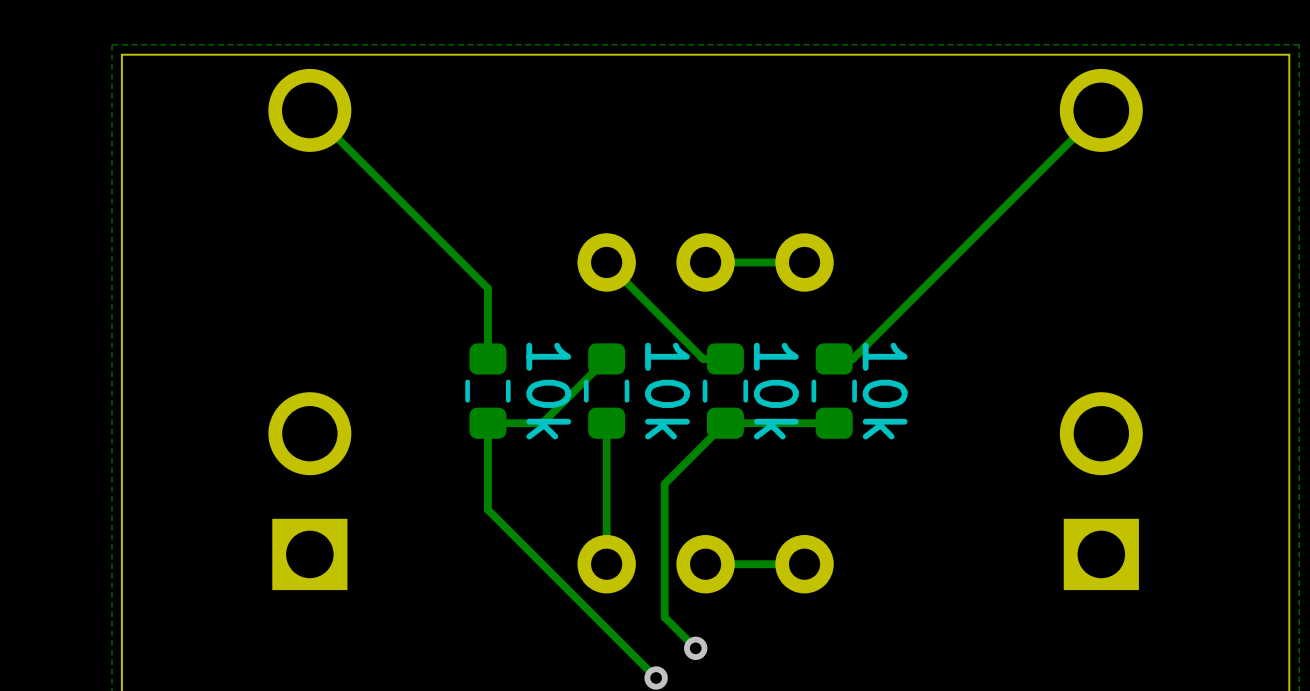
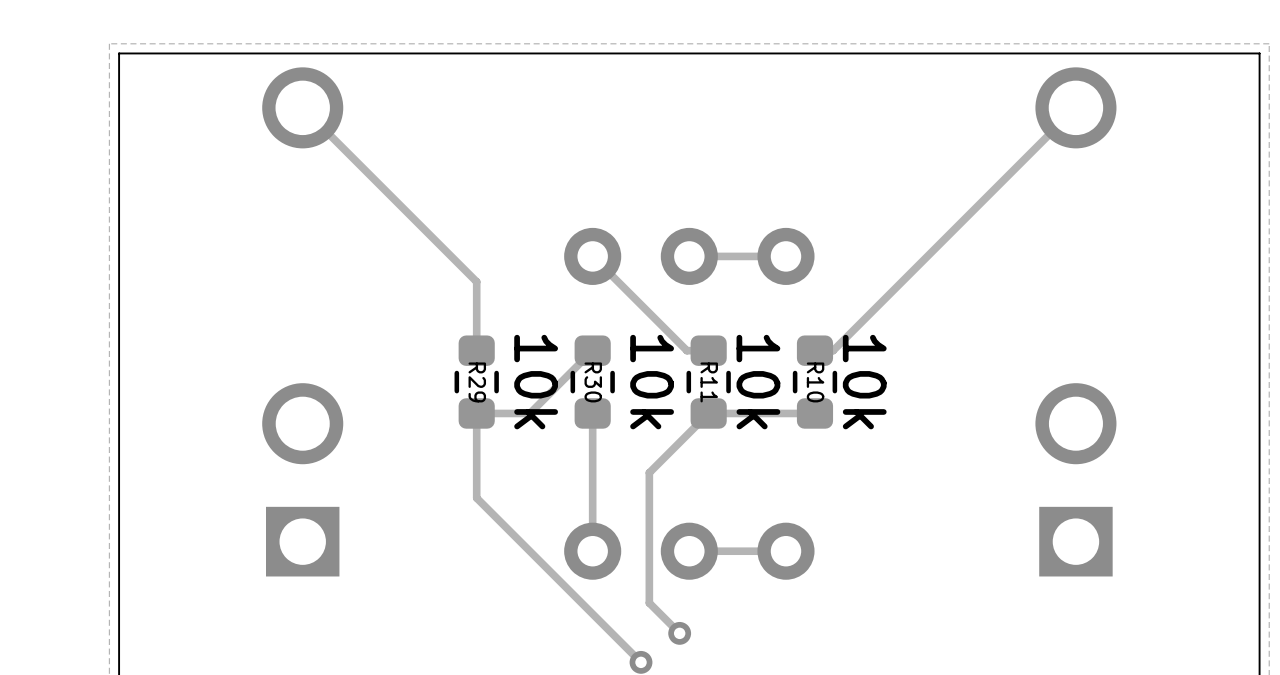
R29 name: none -> R29 (477, 382)
R30 name: none -> R30 (593, 382)
R11 name: none -> R11 (709, 382)
R10 name: none -> R10 (815, 382)

